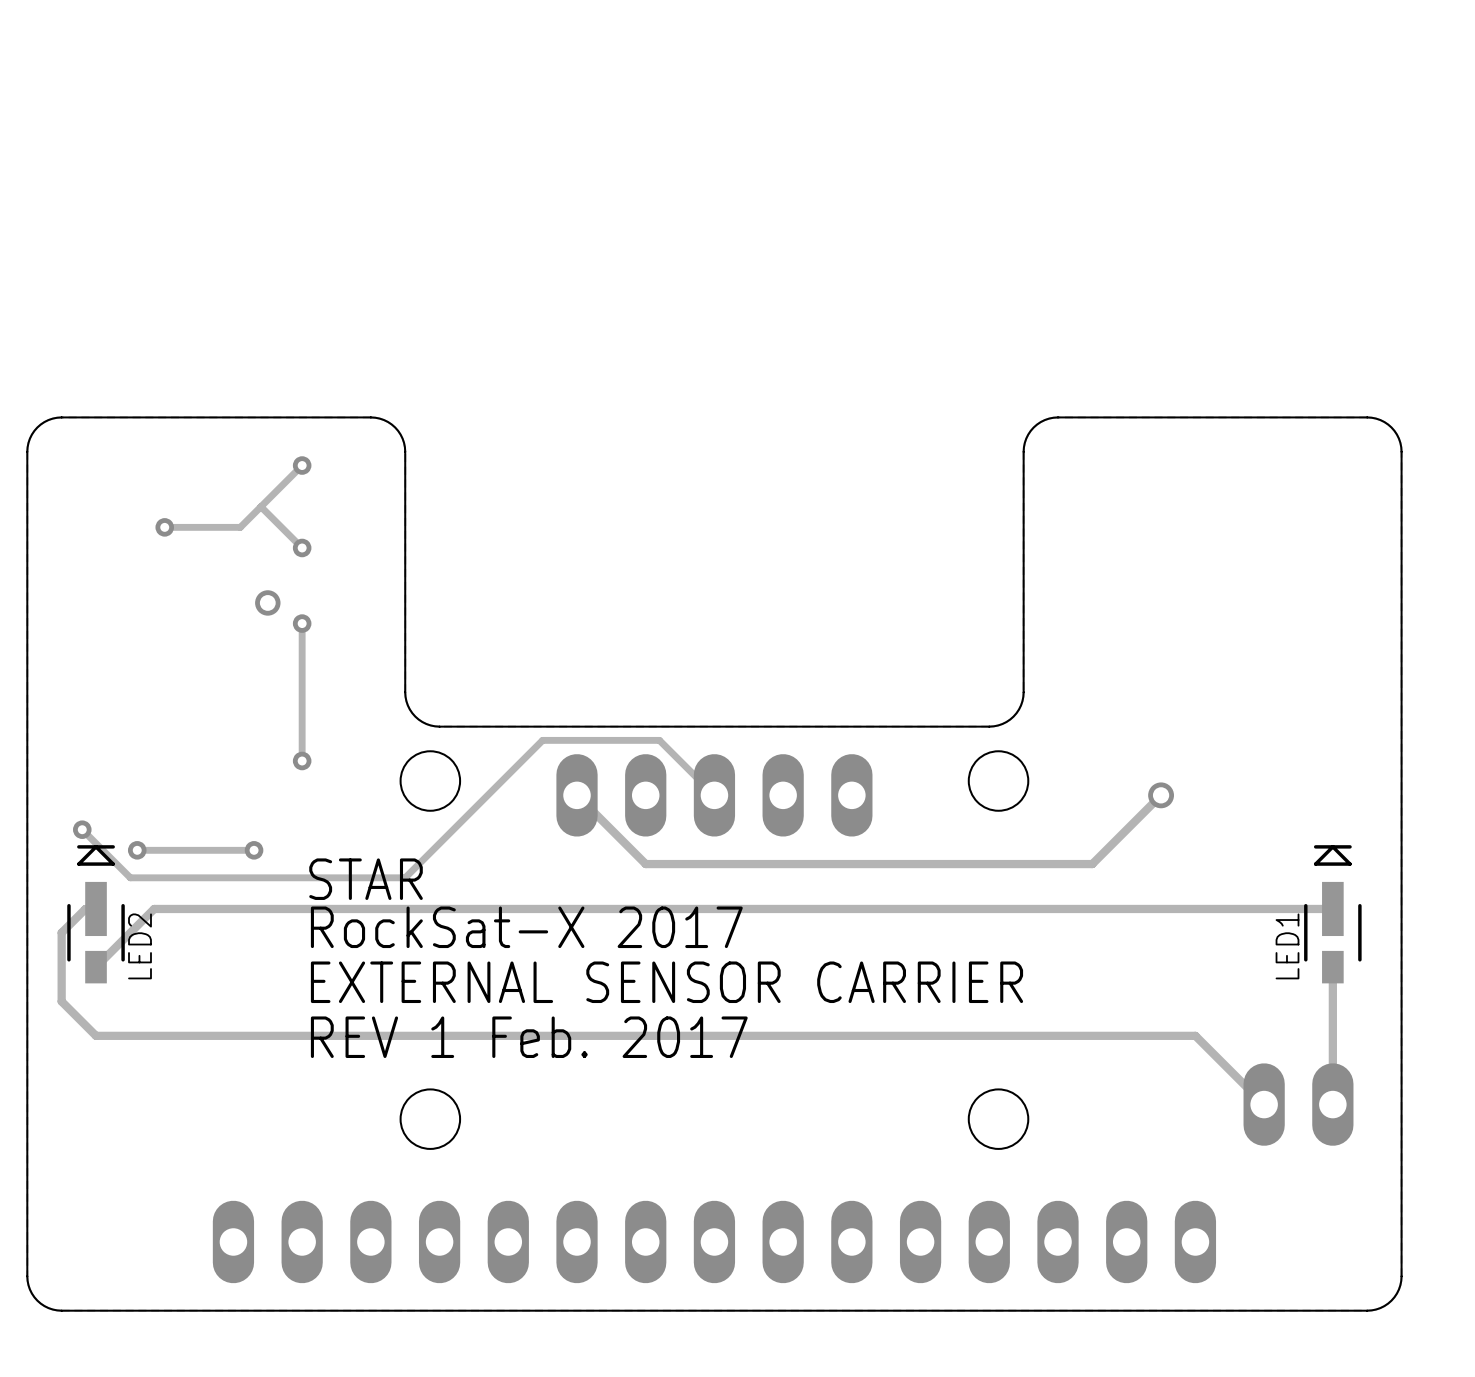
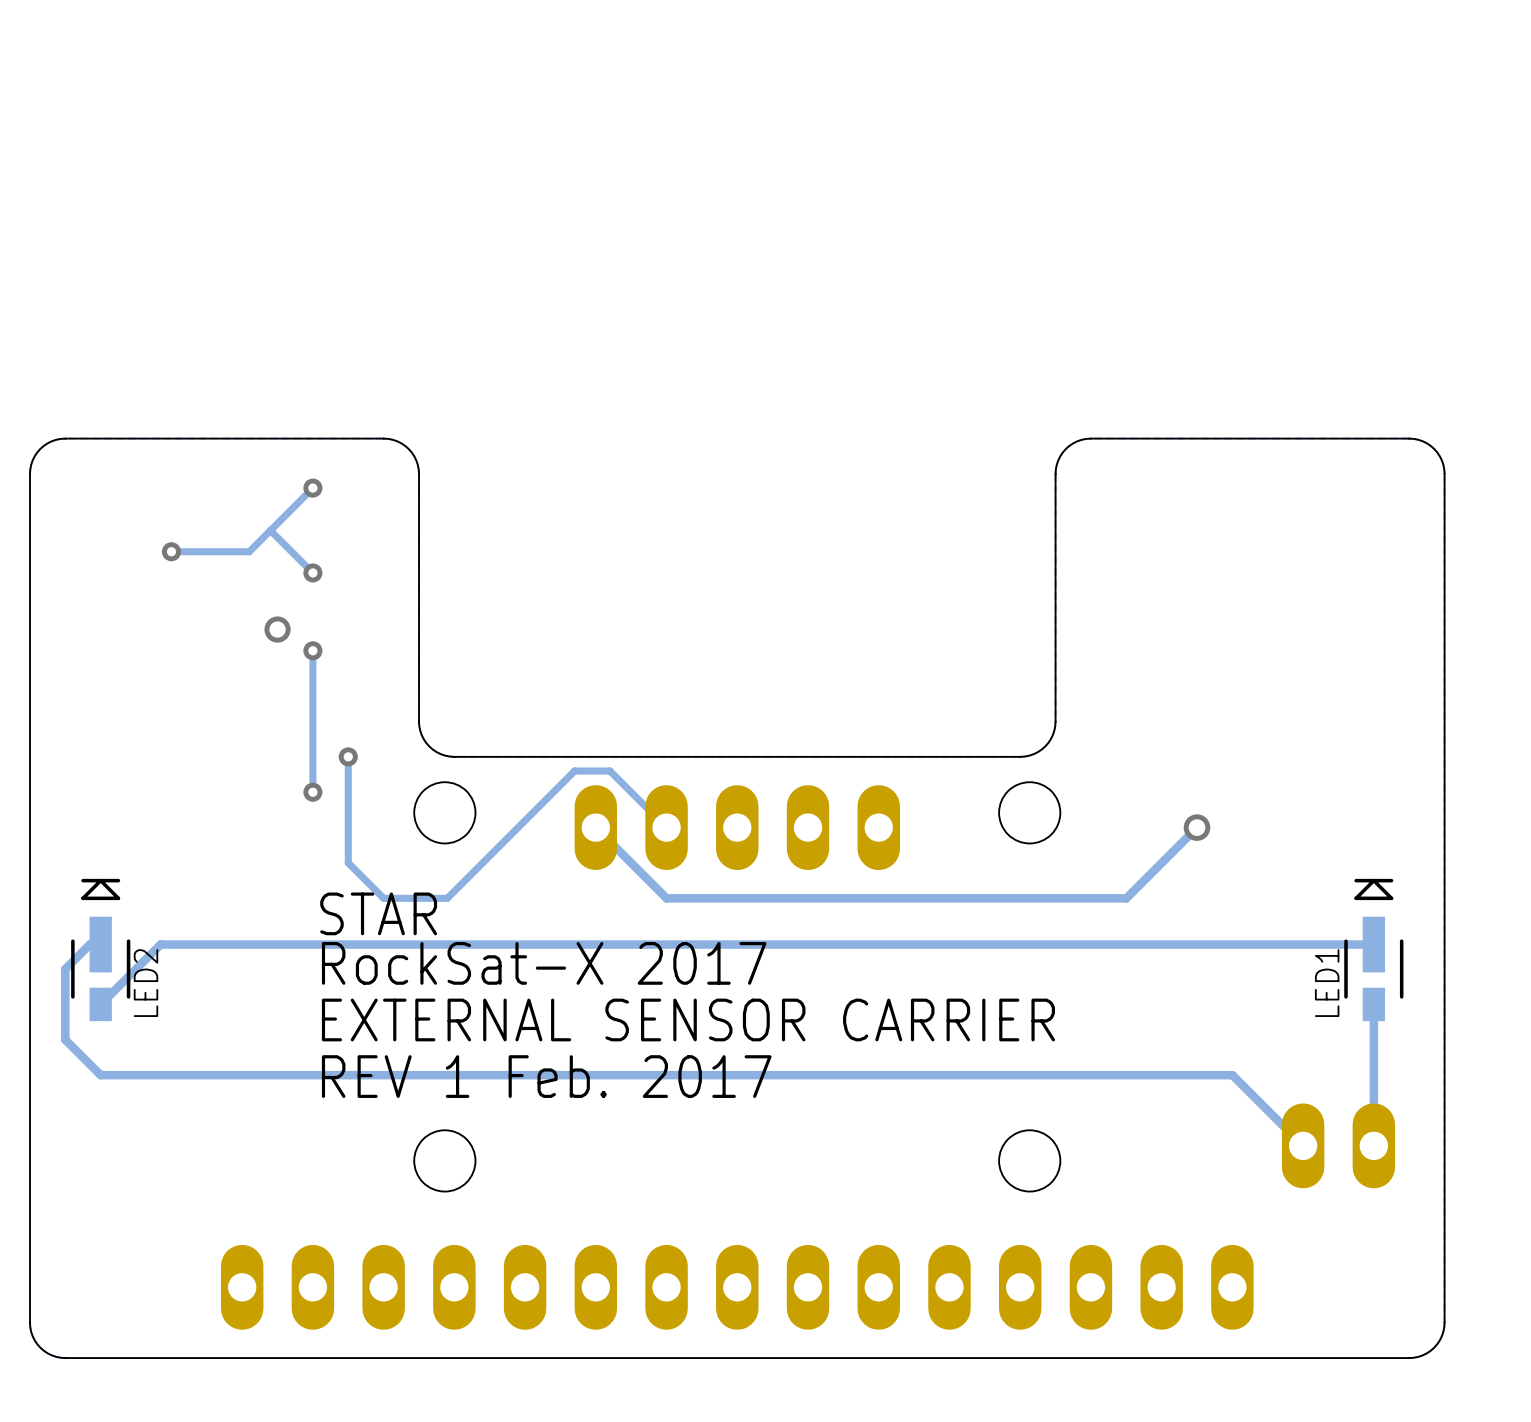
via: none -> (348, 756)
track: (556, 740) (542, 740) (405, 877) (130, 877) (82, 829) -> (574, 771) (447, 898) (383, 898) (348, 862) (348, 756)
track: (590, 740) (659, 740) (714, 795) -> (609, 771) (666, 827)
via: (82, 829) -> none
via: (137, 850) -> none
track: (254, 850) (137, 850) -> none
via: (254, 850) -> none

